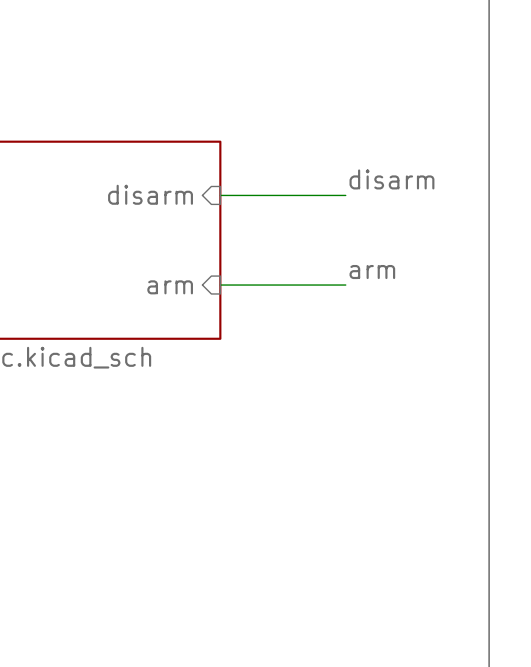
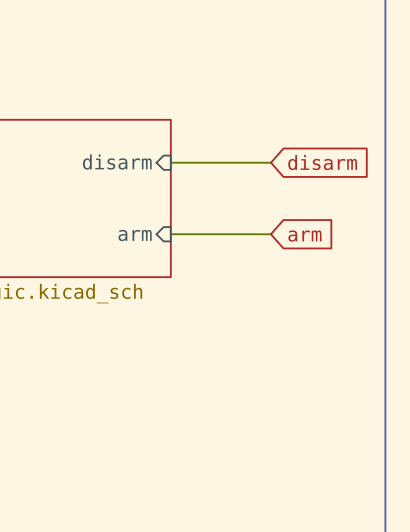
label: disarm (391, 179) -> none
global label: none -> disarm (322, 162)
label: arm (372, 272) -> none
global label: none -> arm (304, 236)

